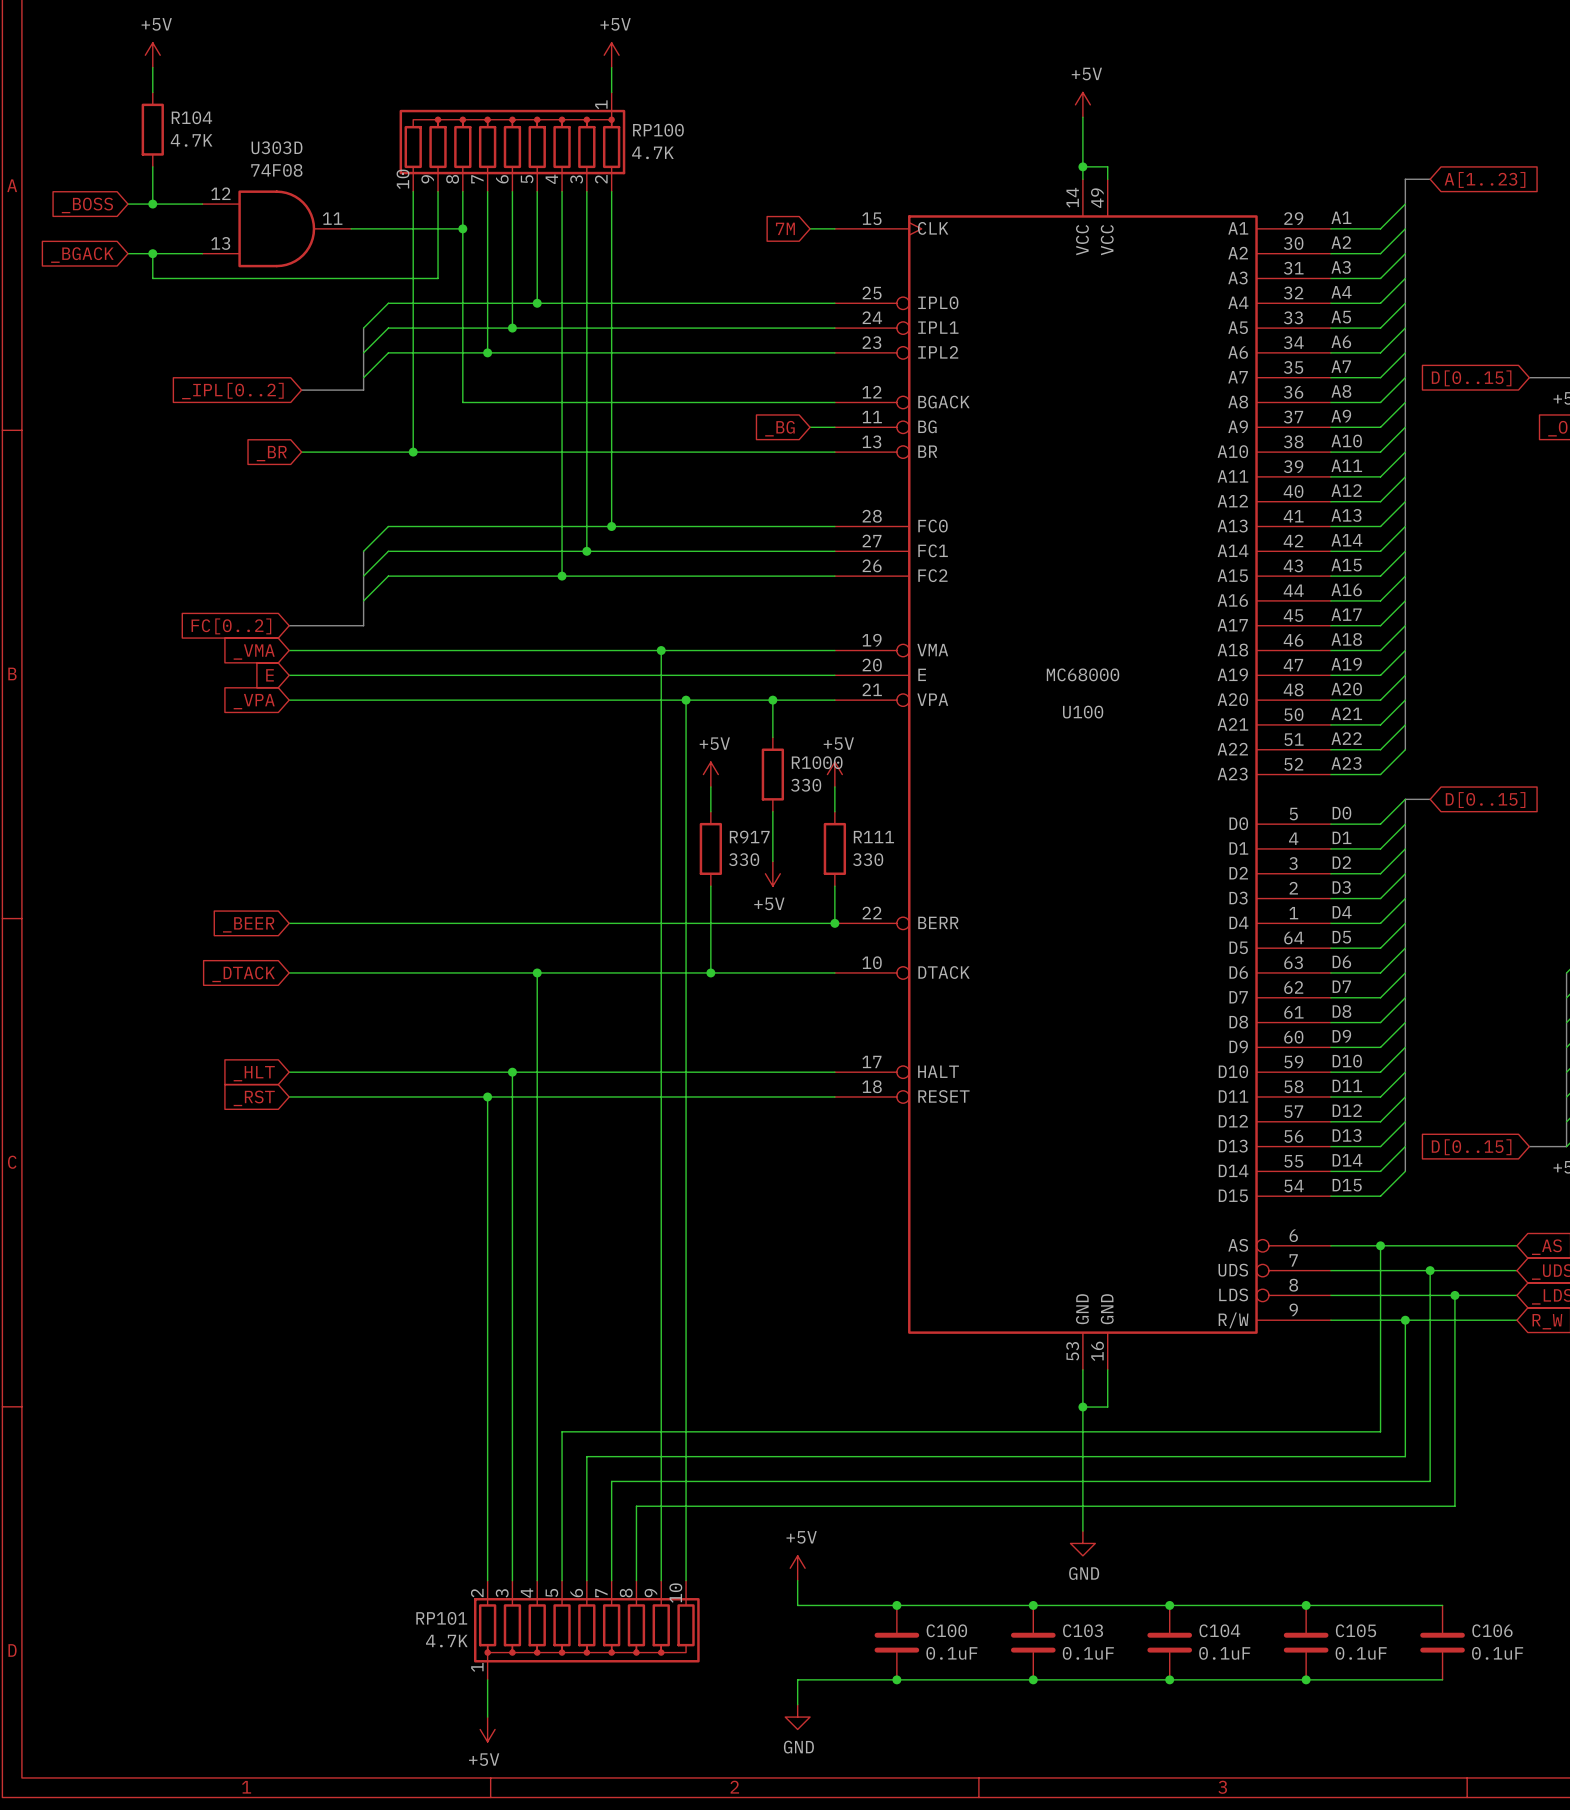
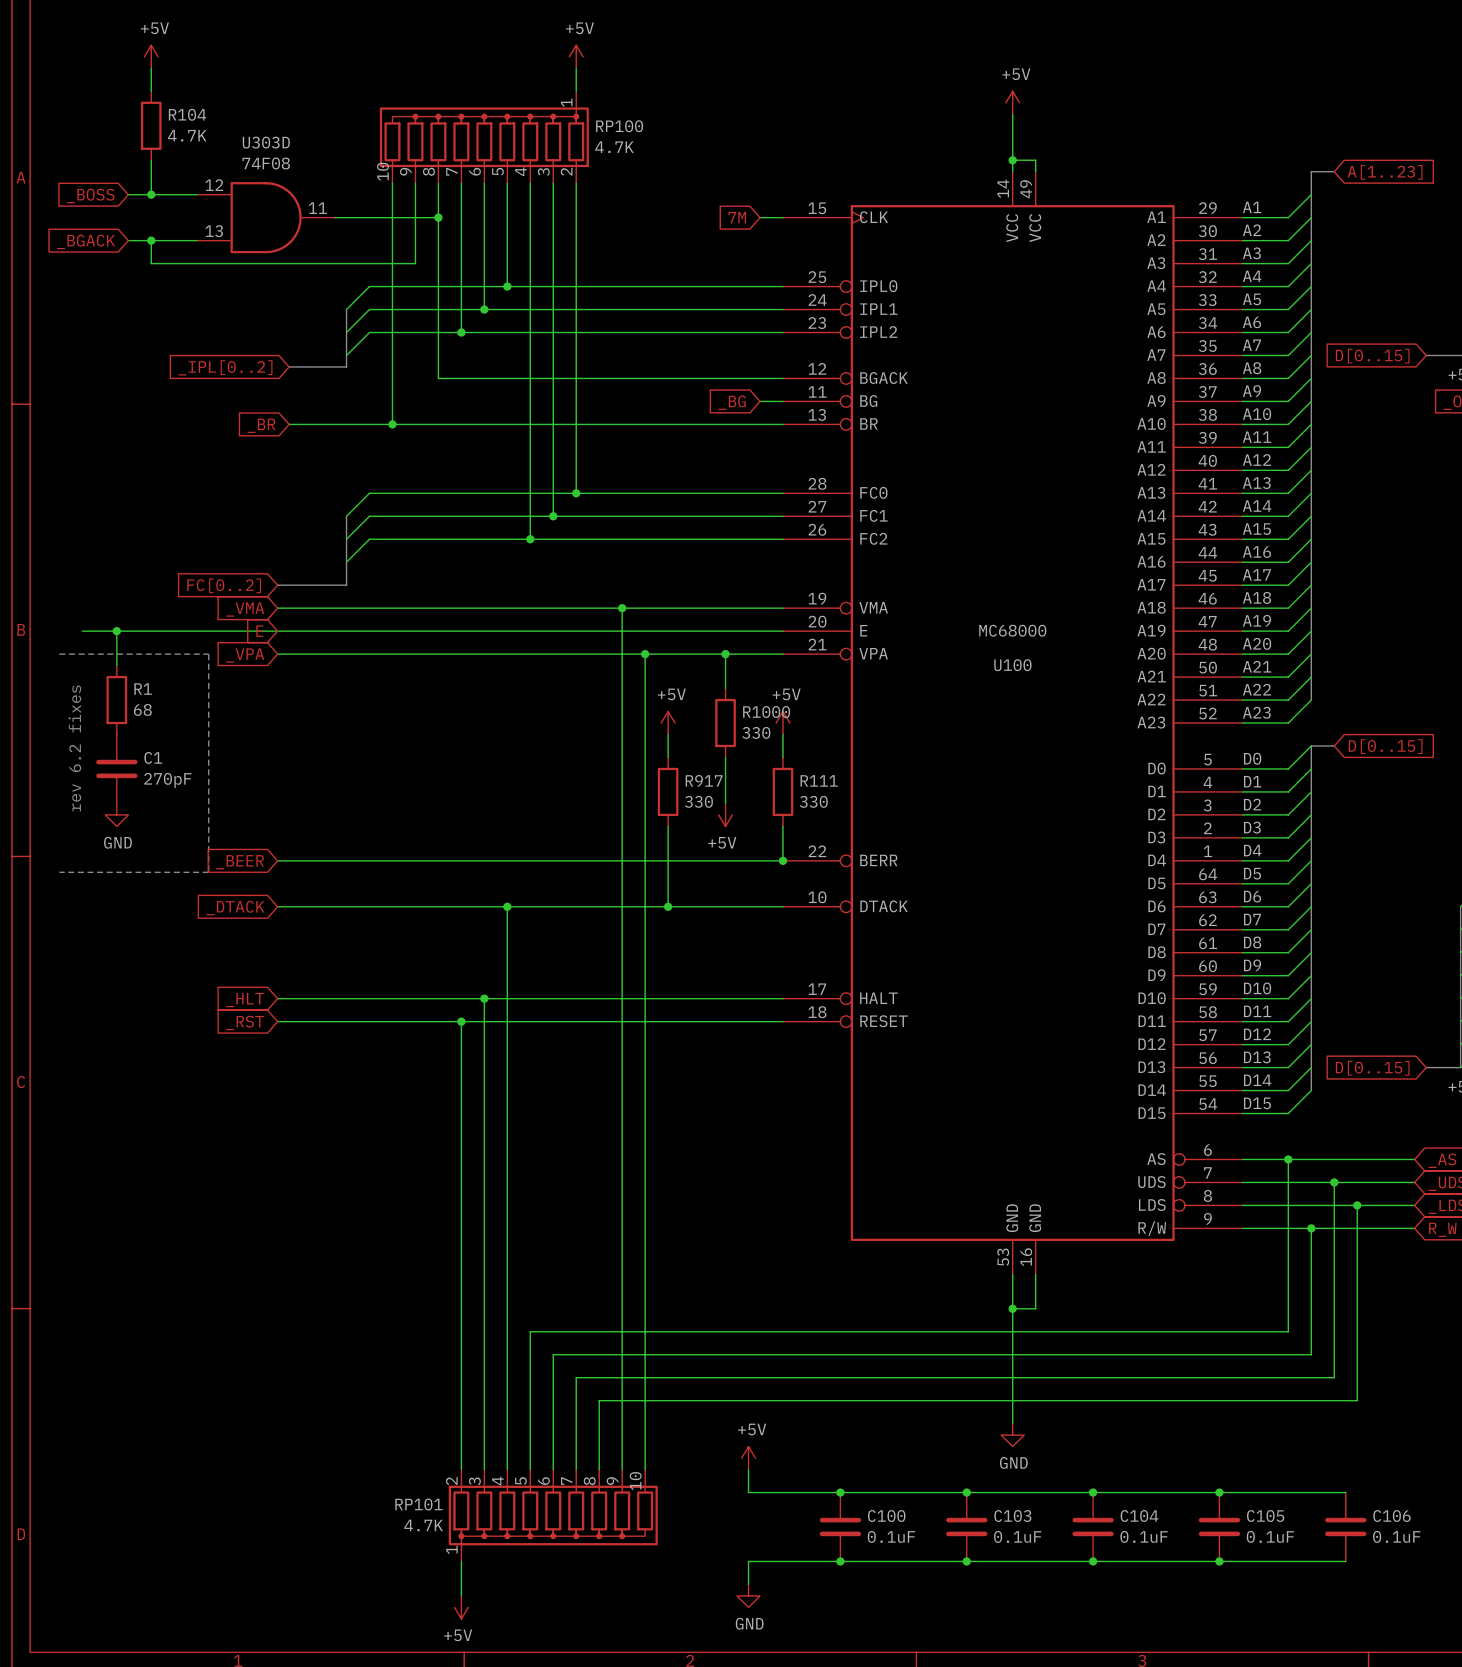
wire: none -> (82, 631) (277, 631)
wire: none -> (116, 631) (116, 665)
junction: none -> (116, 631)
line: none -> (59, 654) (208, 654) (208, 872) (59, 872)
R1: none -> 68 (116, 700)
text: none -> rev 6.2 fixes (74, 748)
C1: none -> 270pF (116, 768)
power symbol: none -> GND (116, 814)

